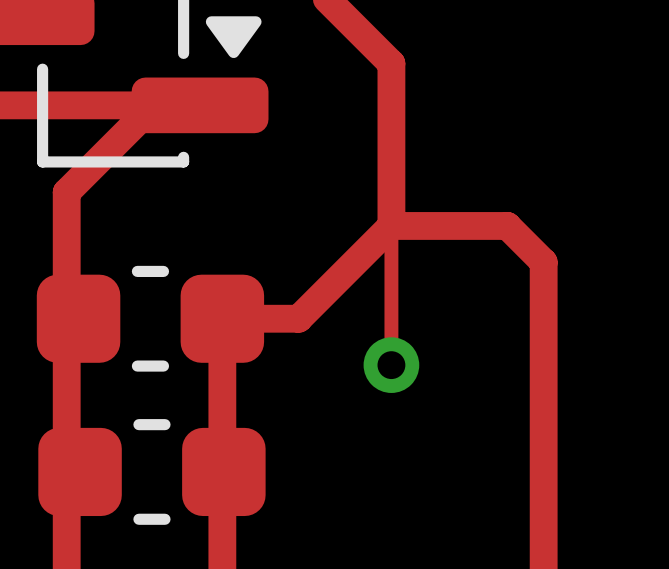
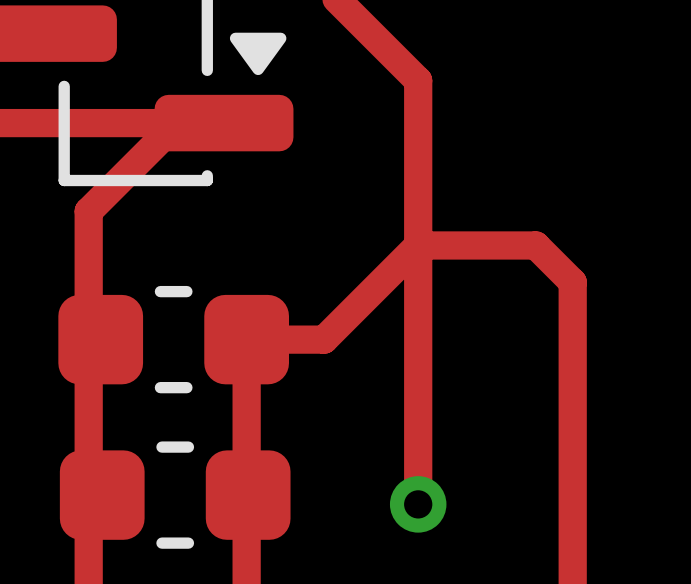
track width: thin (391, 225) (391, 365) -> thick (418, 245) (418, 386)
track: none -> (418, 386) (418, 504)
via position: (391, 365) -> (418, 504)

